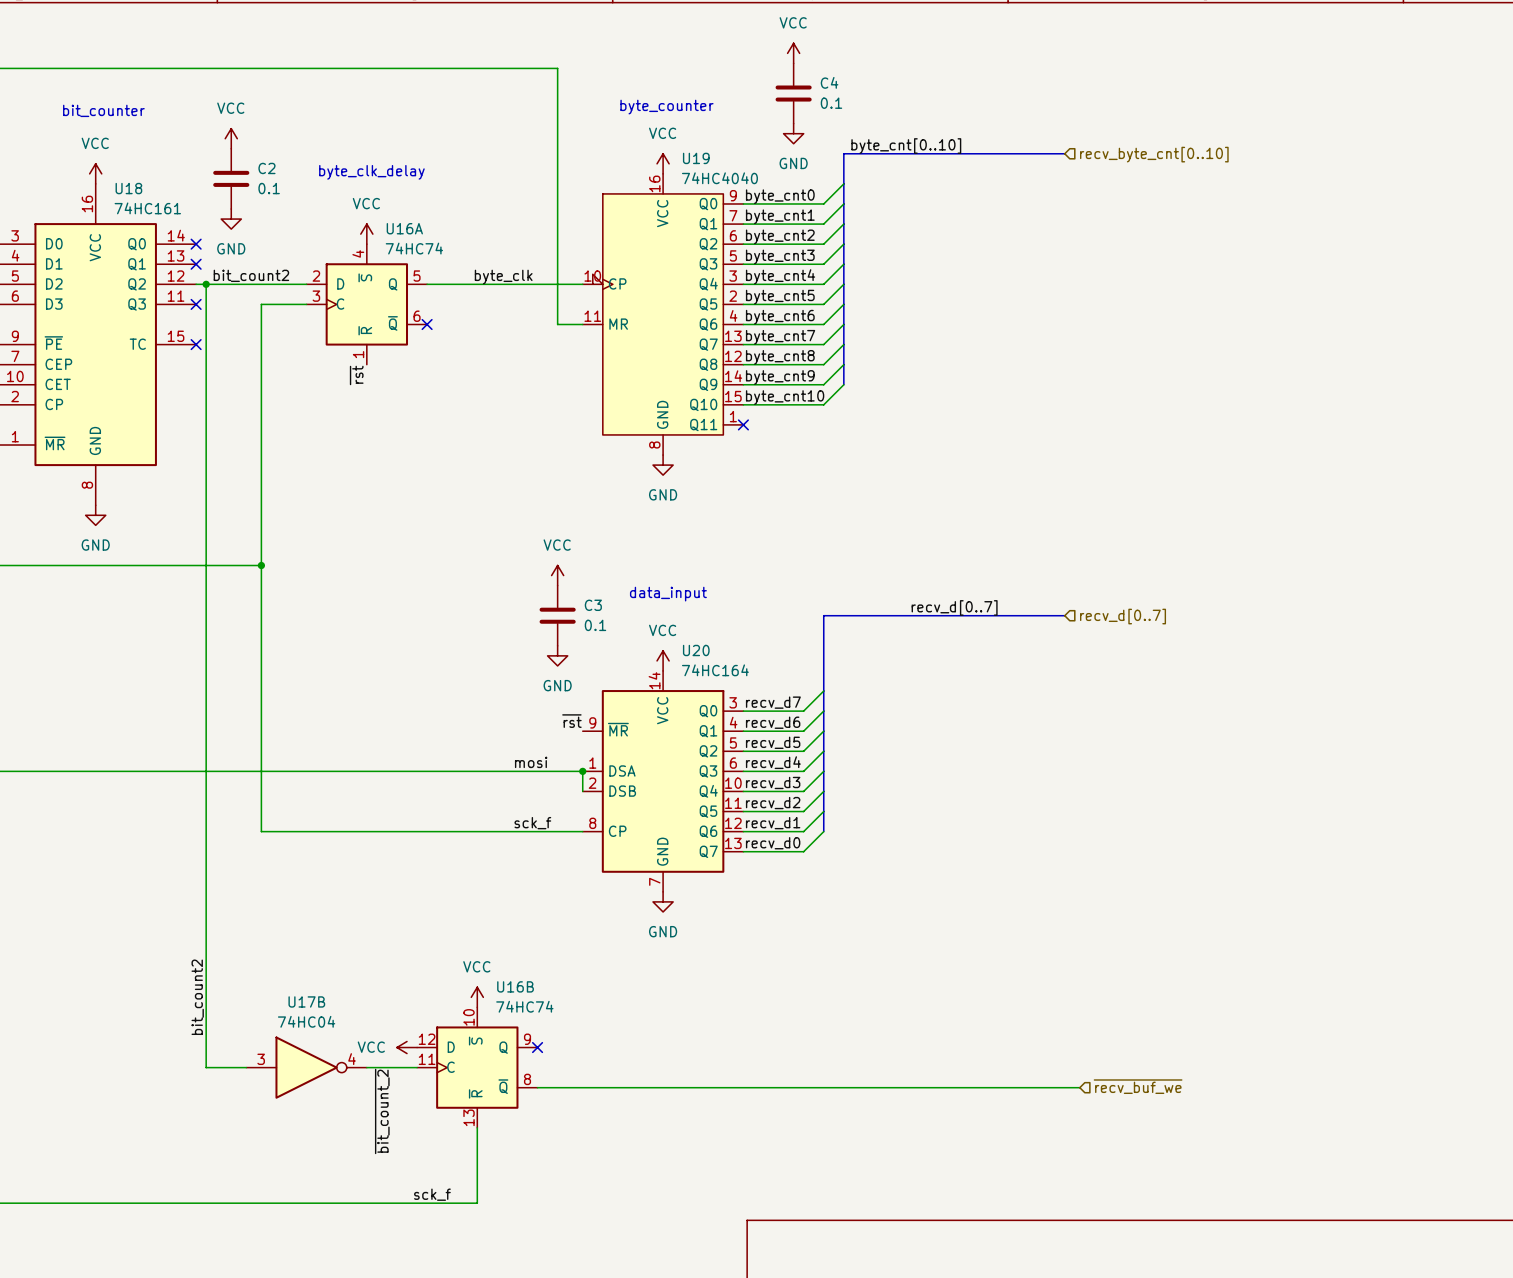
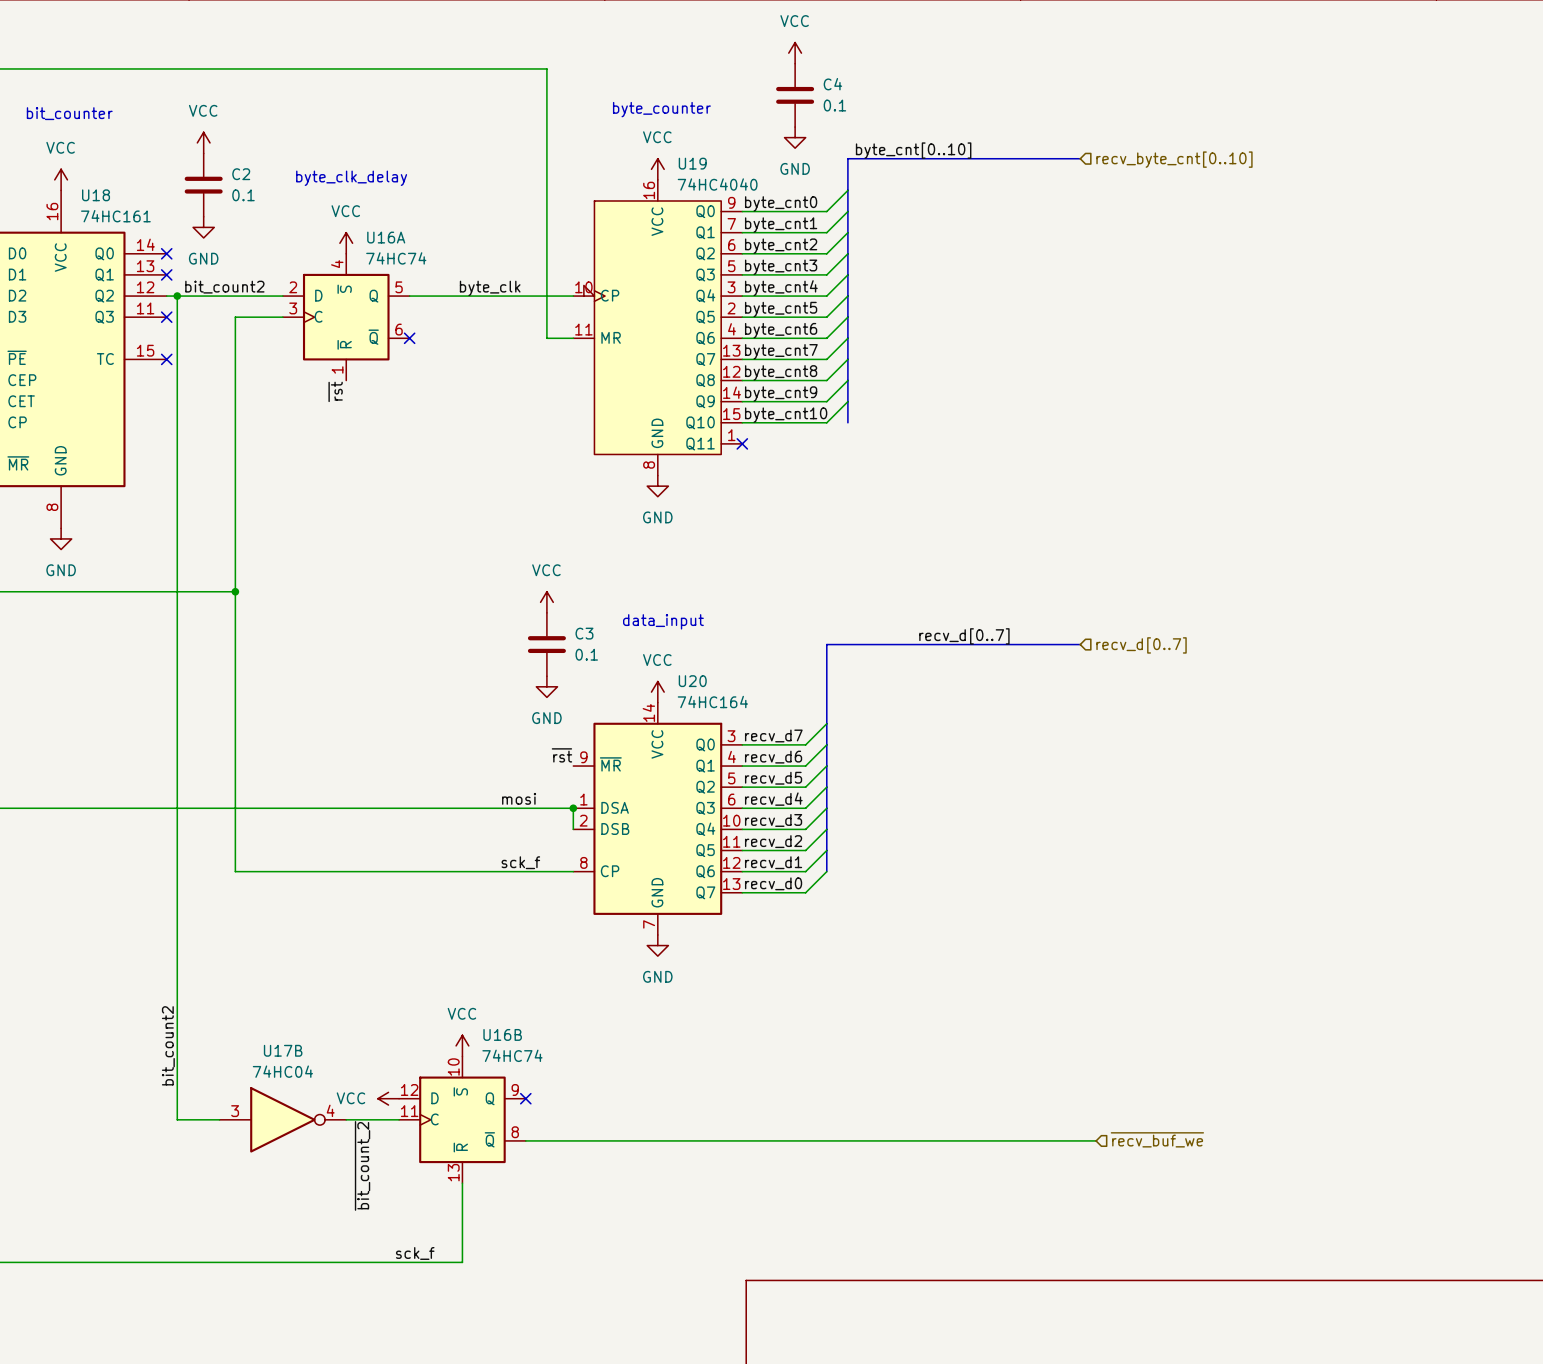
bus: none -> (847, 401) (847, 422)

